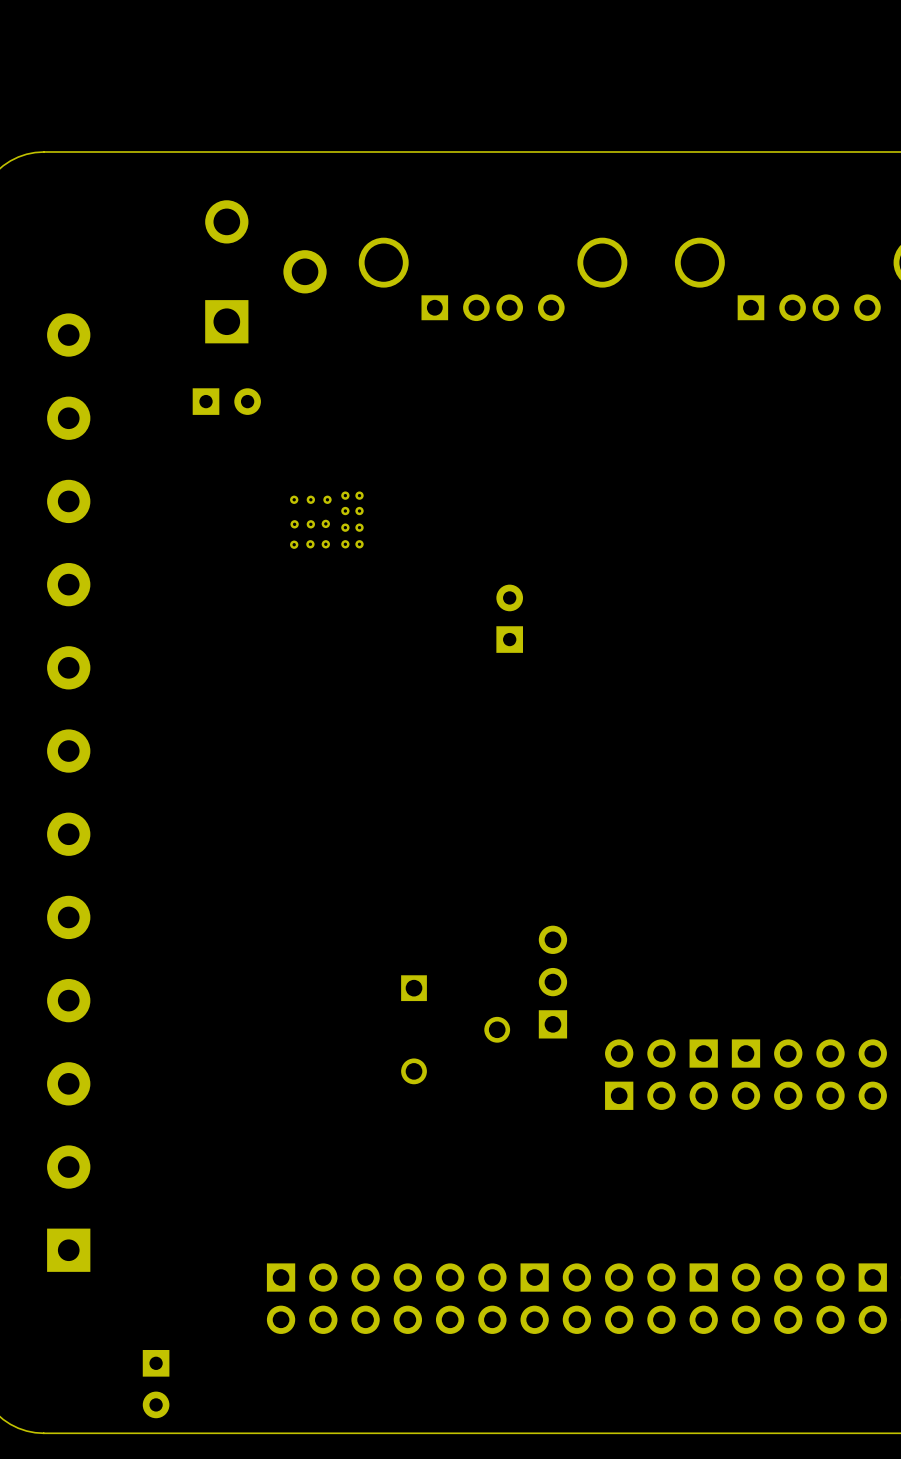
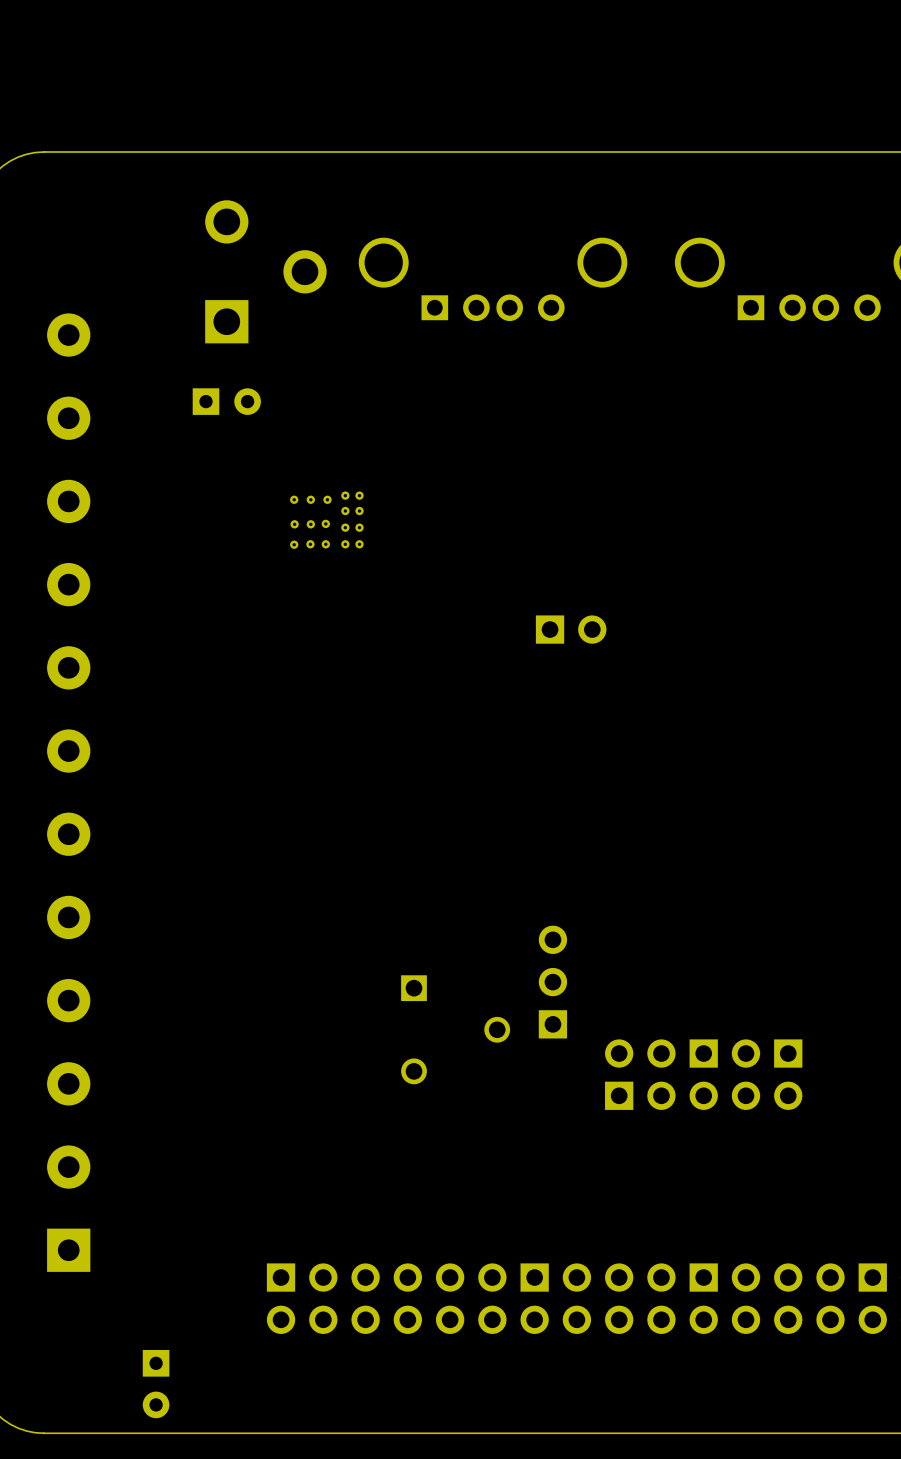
part: (509, 618) -> none
part: none -> (571, 629)
part: none -> (767, 1074)
part: (809, 1074) -> none

